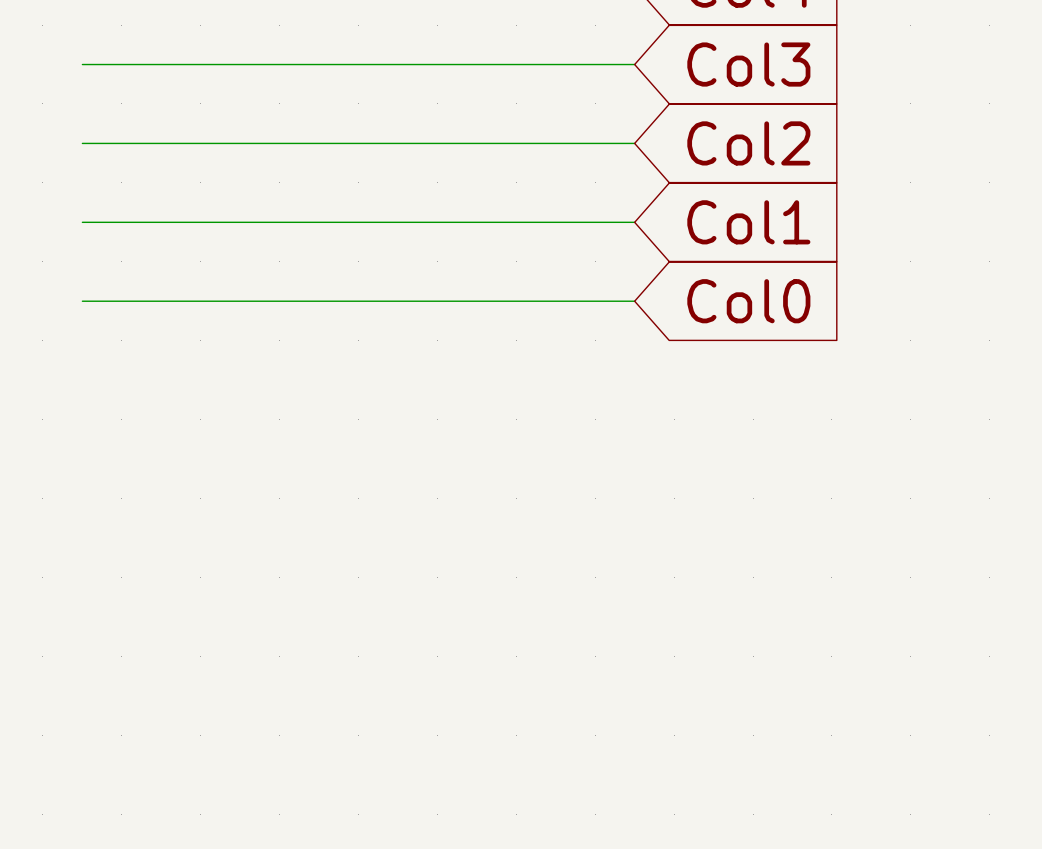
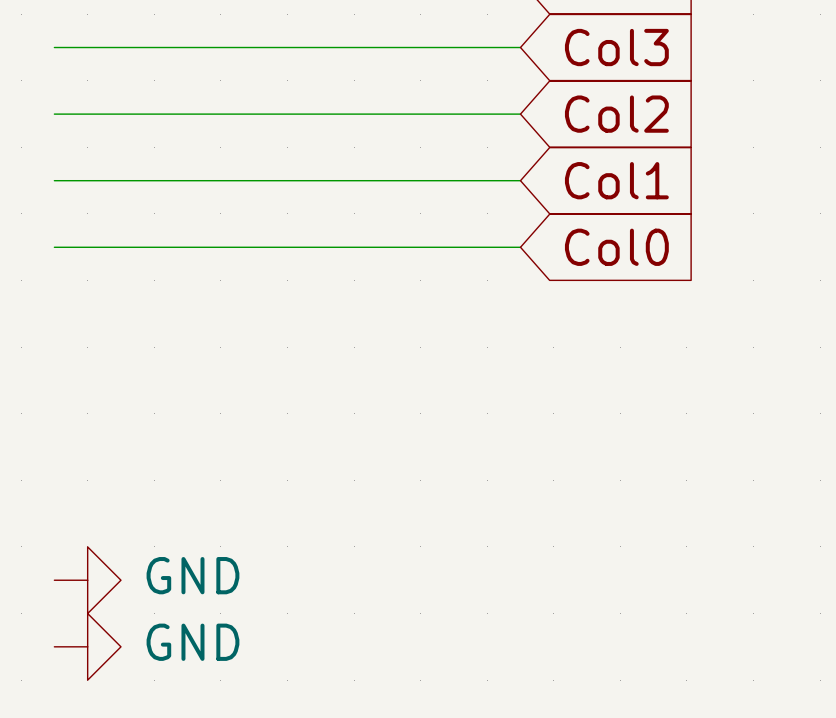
power symbol: none -> GND (87, 580)
power symbol: none -> GND (87, 646)

